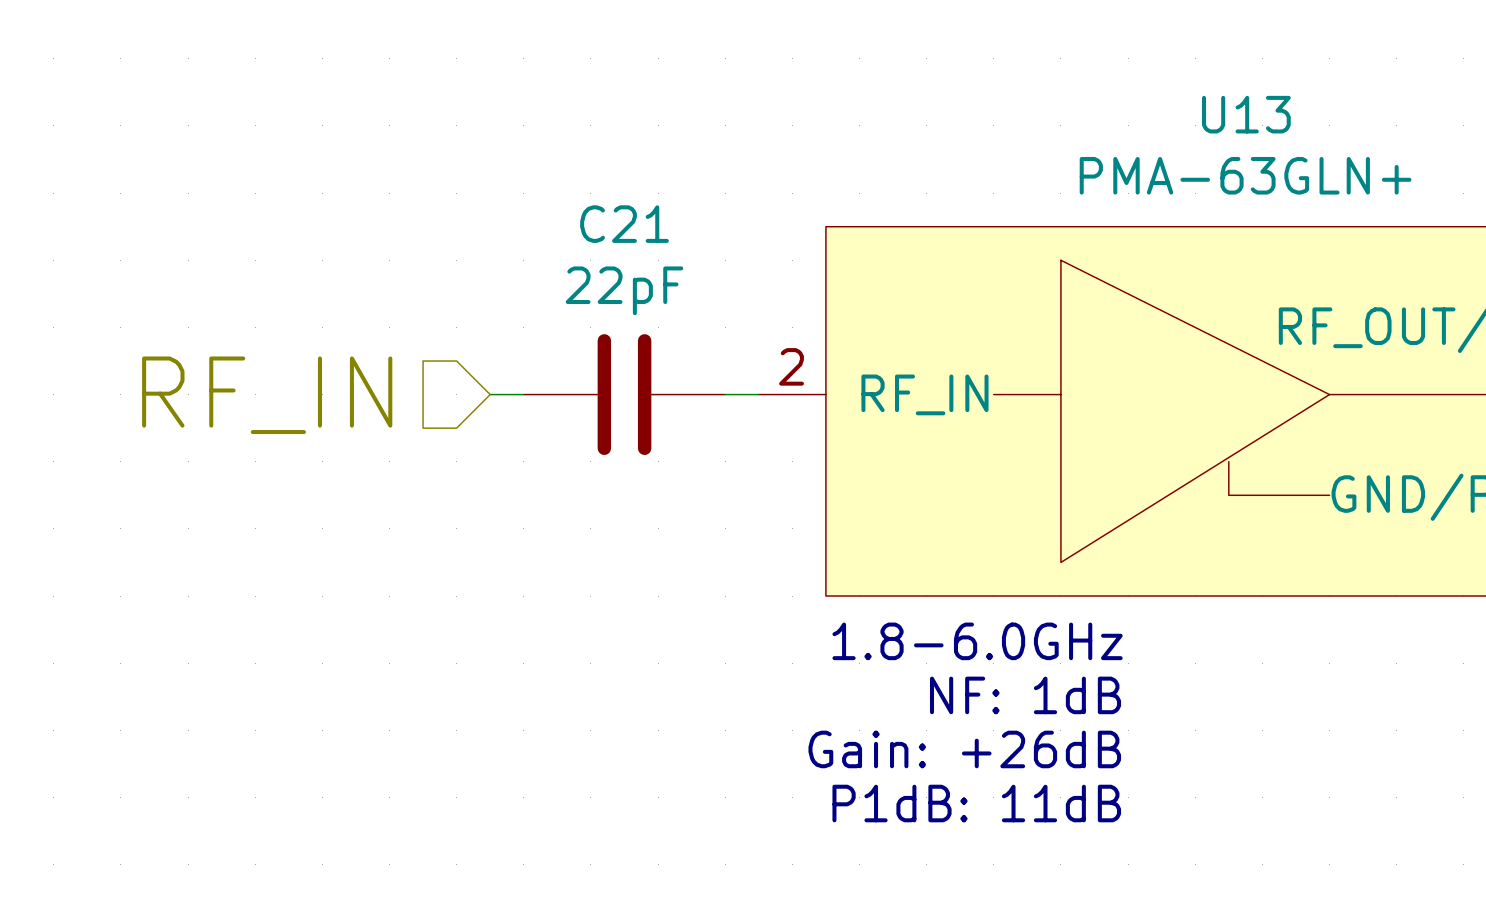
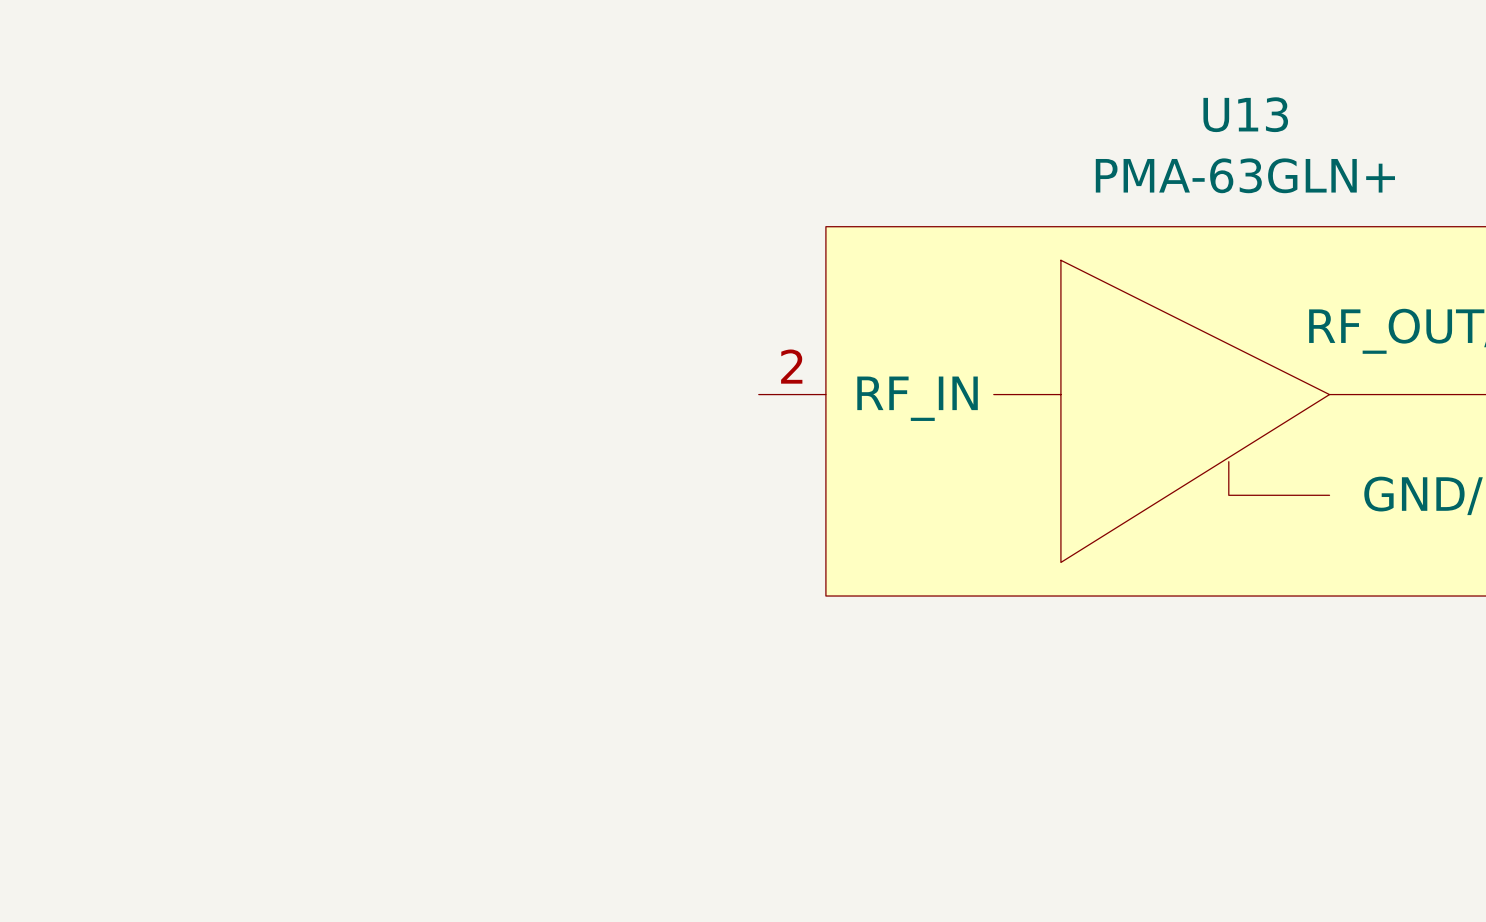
wire: (490, 394) (523, 394) -> none
C21: 22pF (624, 394) -> none
wire: (725, 394) (758, 394) -> none
hierarchical label: RF_IN (267, 395) -> none
text: 1.8-6.0GHz (977, 641) -> none
text: NF: 1dB (1025, 695) -> none
text: Gain: +26dB (964, 749) -> none
text: P1dB: 11dB (976, 803) -> none

